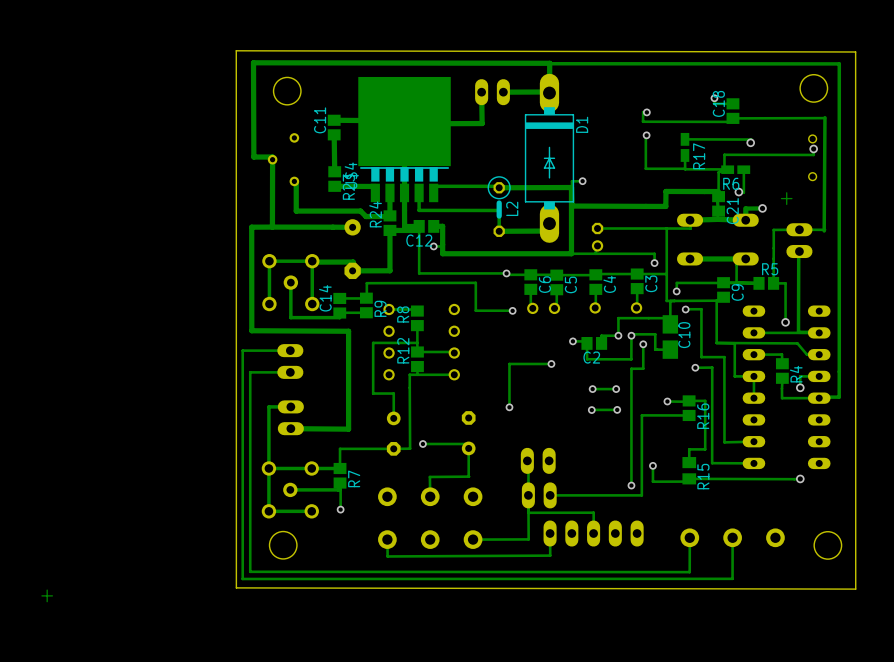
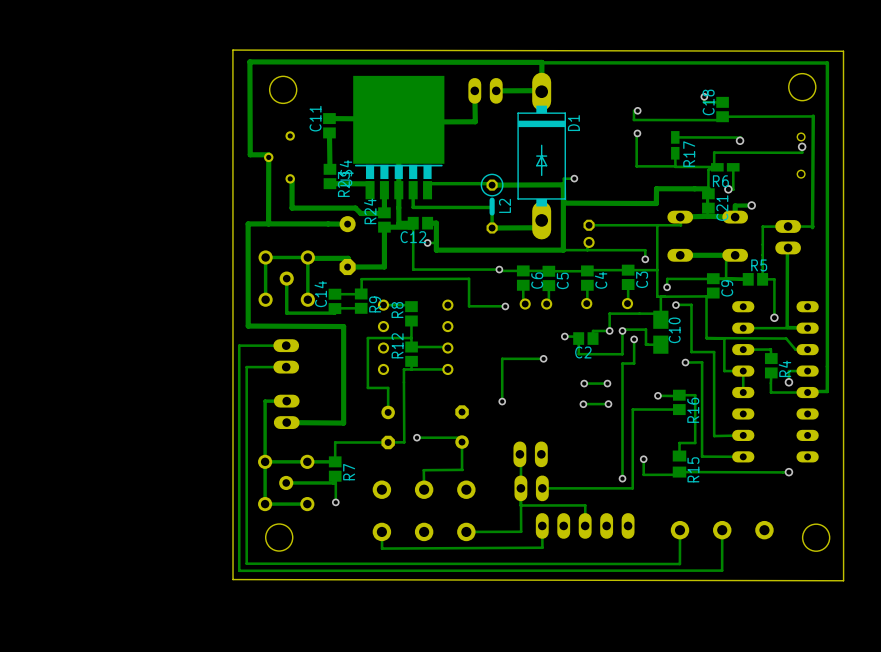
text: + (786, 198) -> none
text: + (47, 595) -> none

